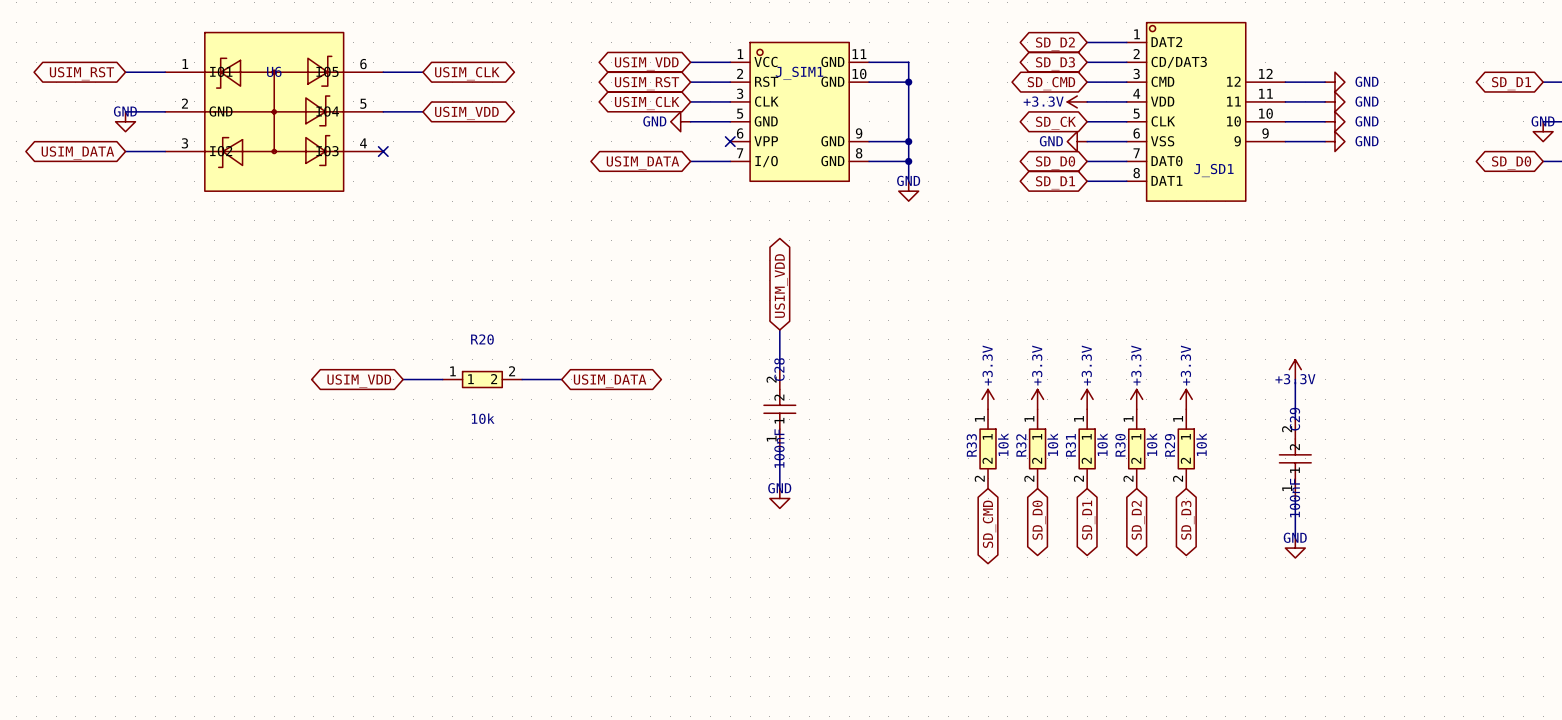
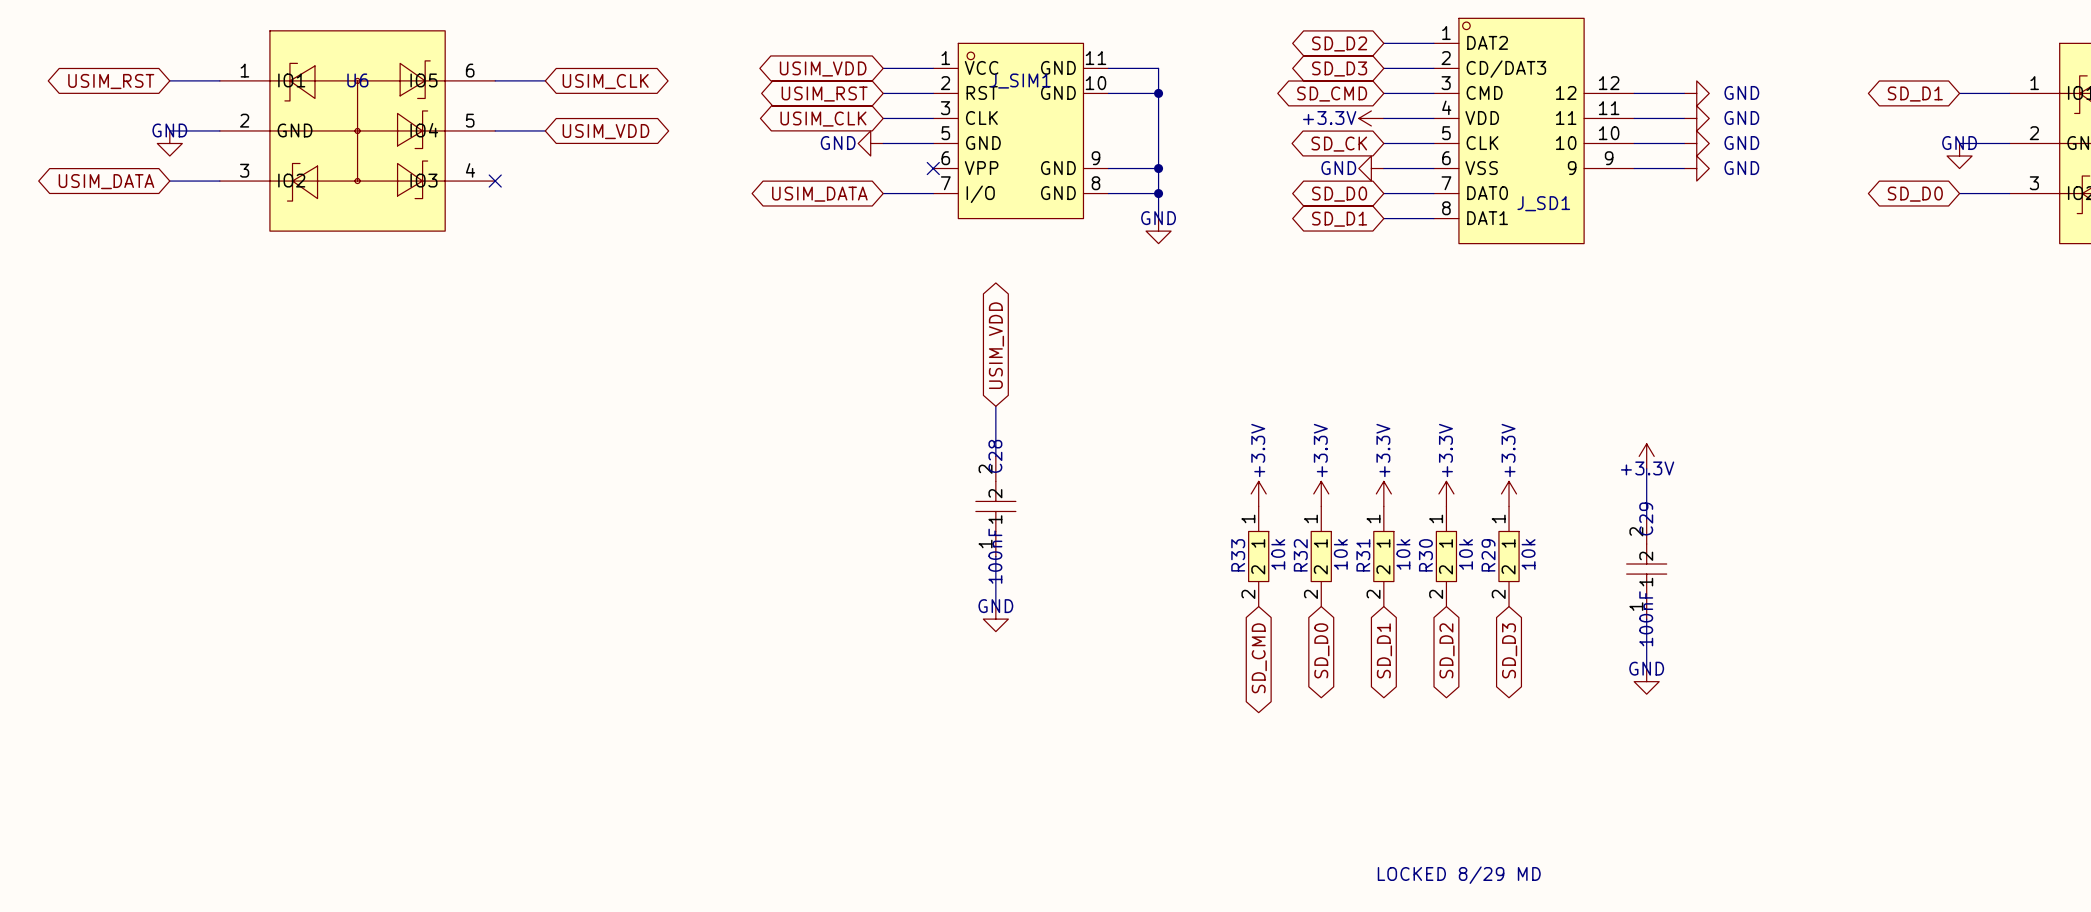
wire: (403, 379) (442, 379) -> none
R20: 10k (482, 379) -> none
wire: (522, 379) (561, 379) -> none
global label: USIM_VDD (359, 381) -> none
global label: USIM_DATA (610, 381) -> none
text: none -> LOCKED 8/29 MD (1459, 875)

